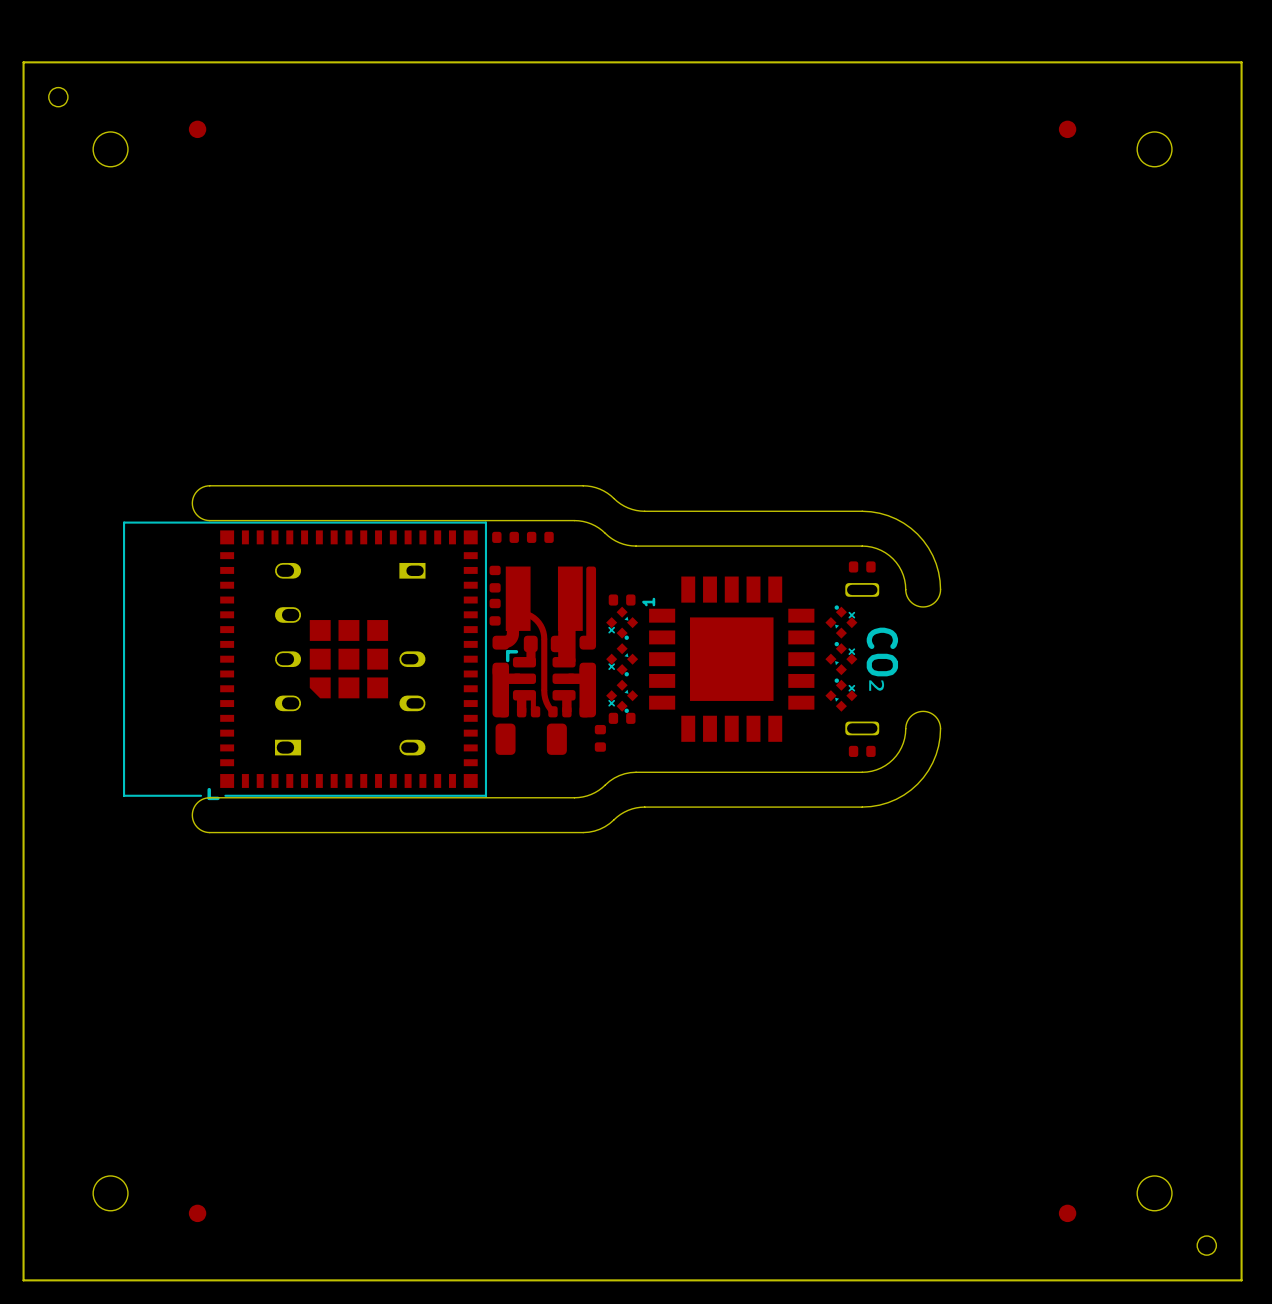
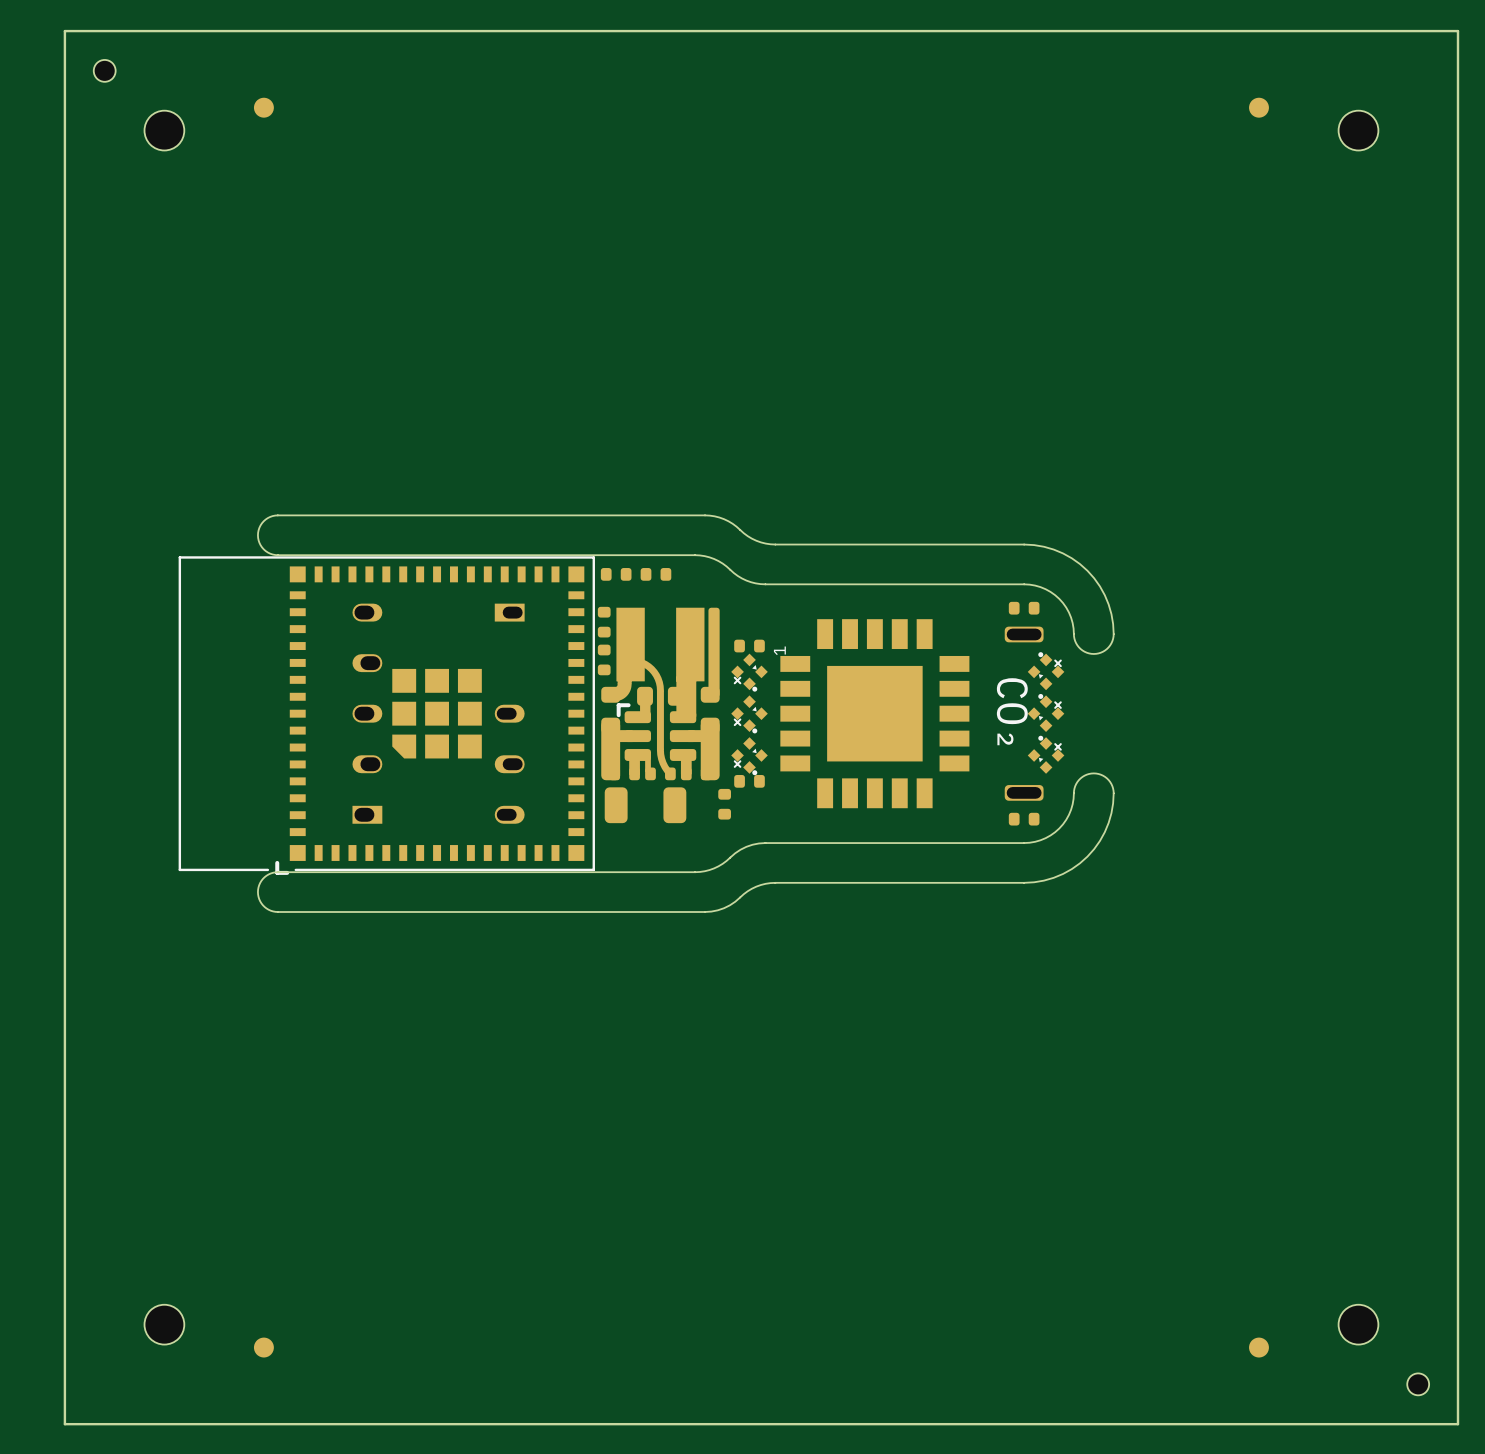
part: (841, 622) -> none
part: none -> (1046, 671)
part: (841, 658) -> none
part: none -> (1046, 712)
text position: CO₂ (882, 660) -> CO₂ (1012, 711)
part: (841, 695) -> none
part: none -> (1046, 754)

